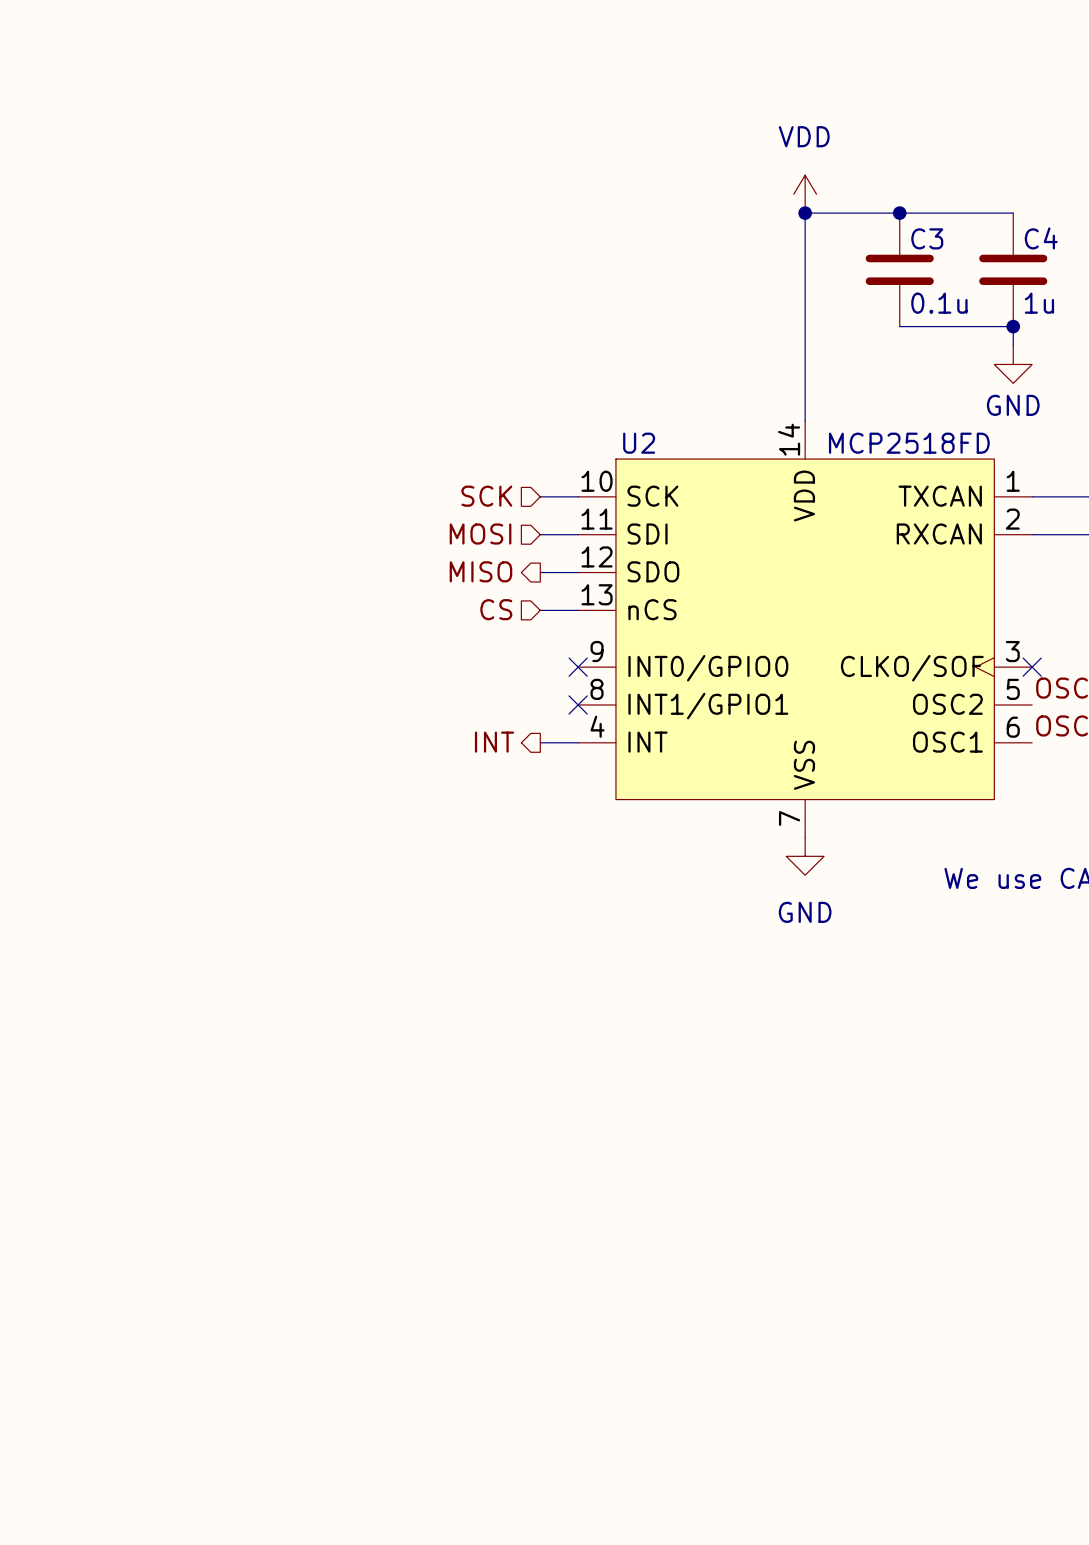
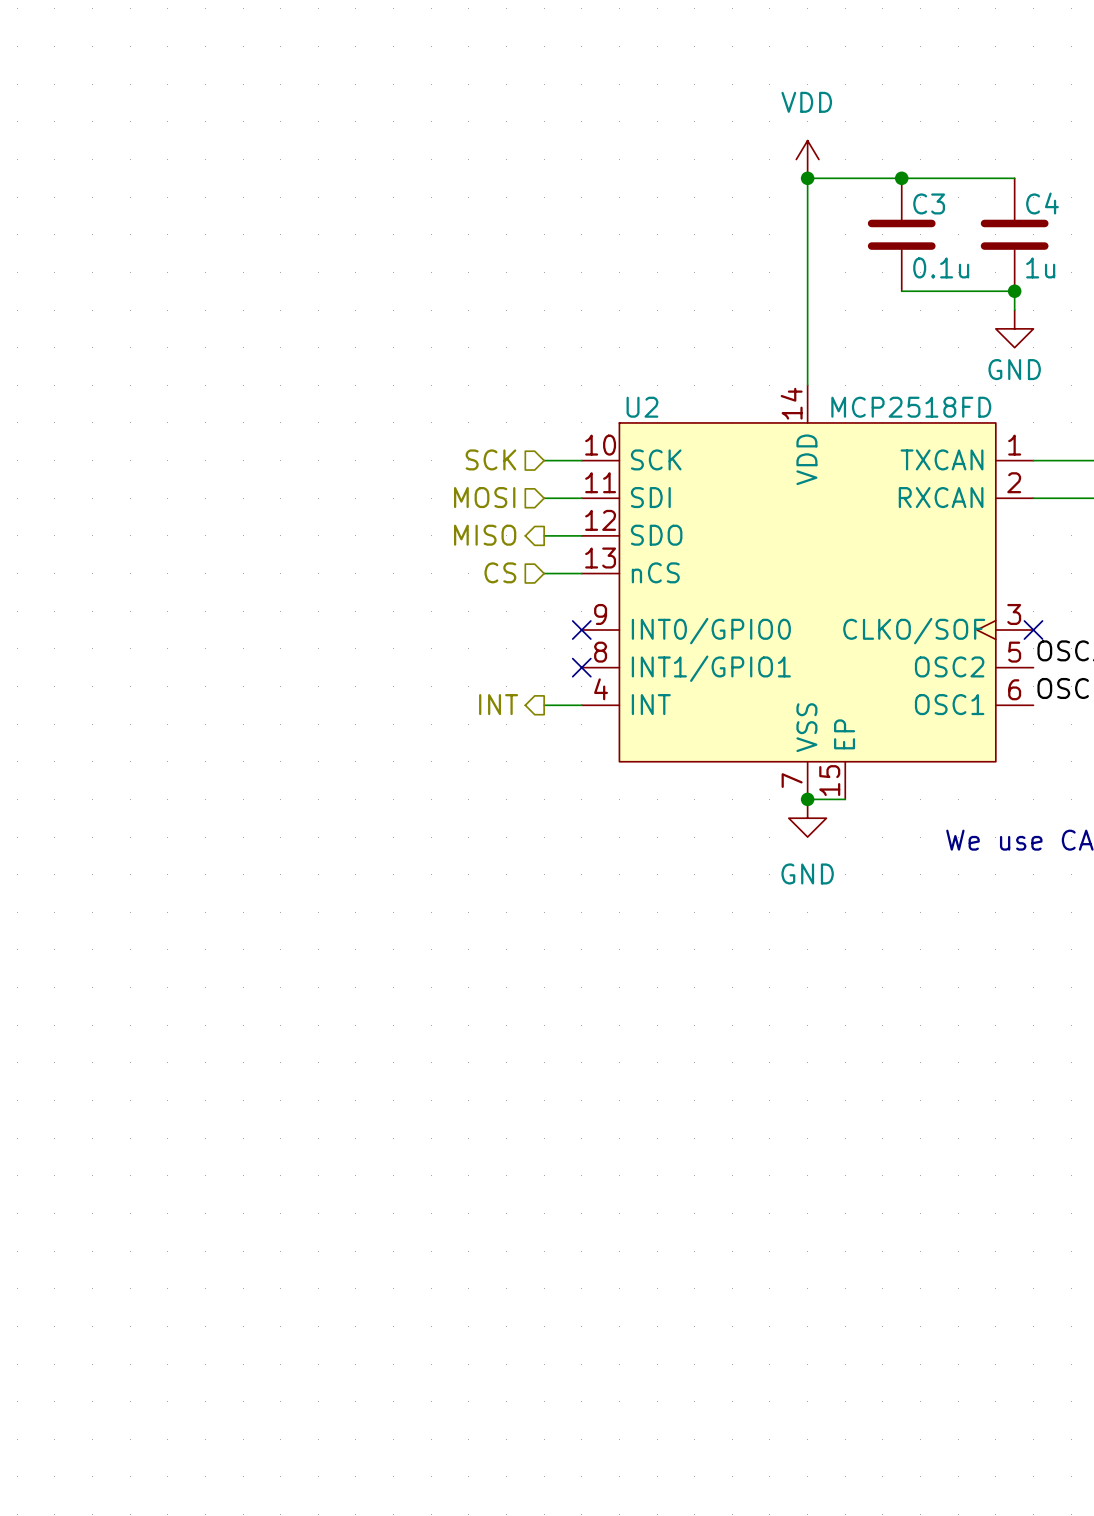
U2 symbol: [578, 421, 1033, 838] -> [581, 385, 1034, 800]
wire: none -> (807, 799) (845, 799)
junction: none -> (807, 799)

